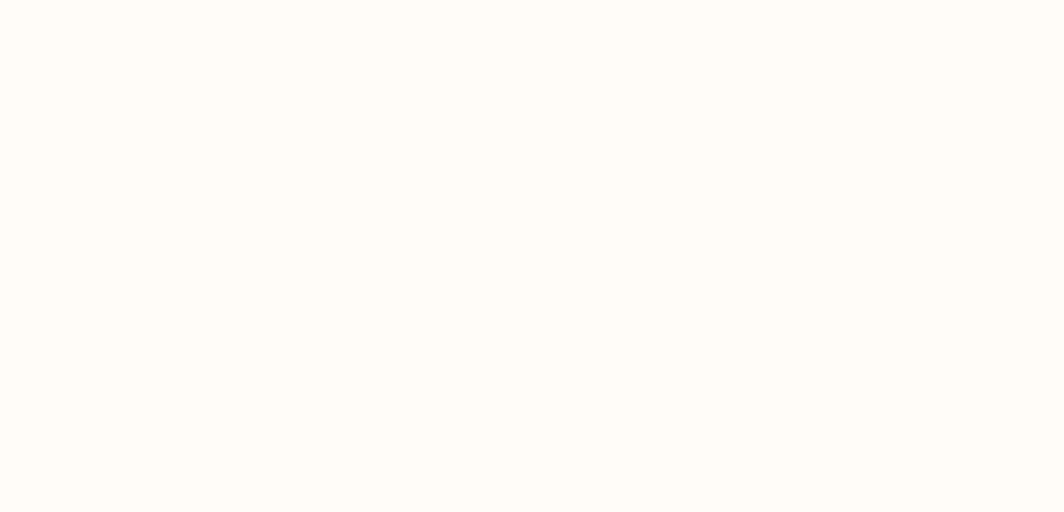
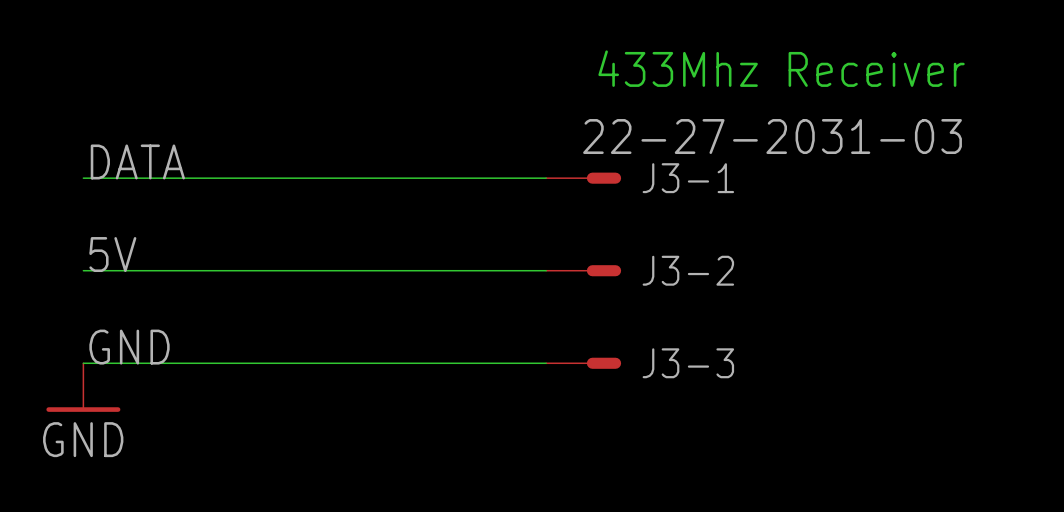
text: none -> 433Mhz Receiver (781, 68)
label: none -> DATA (137, 161)
wire: none -> (83, 178) (546, 178)
J3-1: none -> 22-27-2031-03 (583, 178)
label: none -> 5V (112, 254)
wire: none -> (83, 270) (546, 270)
J3-2: none -> (583, 270)
label: none -> GND (129, 347)
wire: none -> (83, 363) (546, 363)
J3-3: none -> (583, 363)
power symbol: none -> GND (83, 387)

